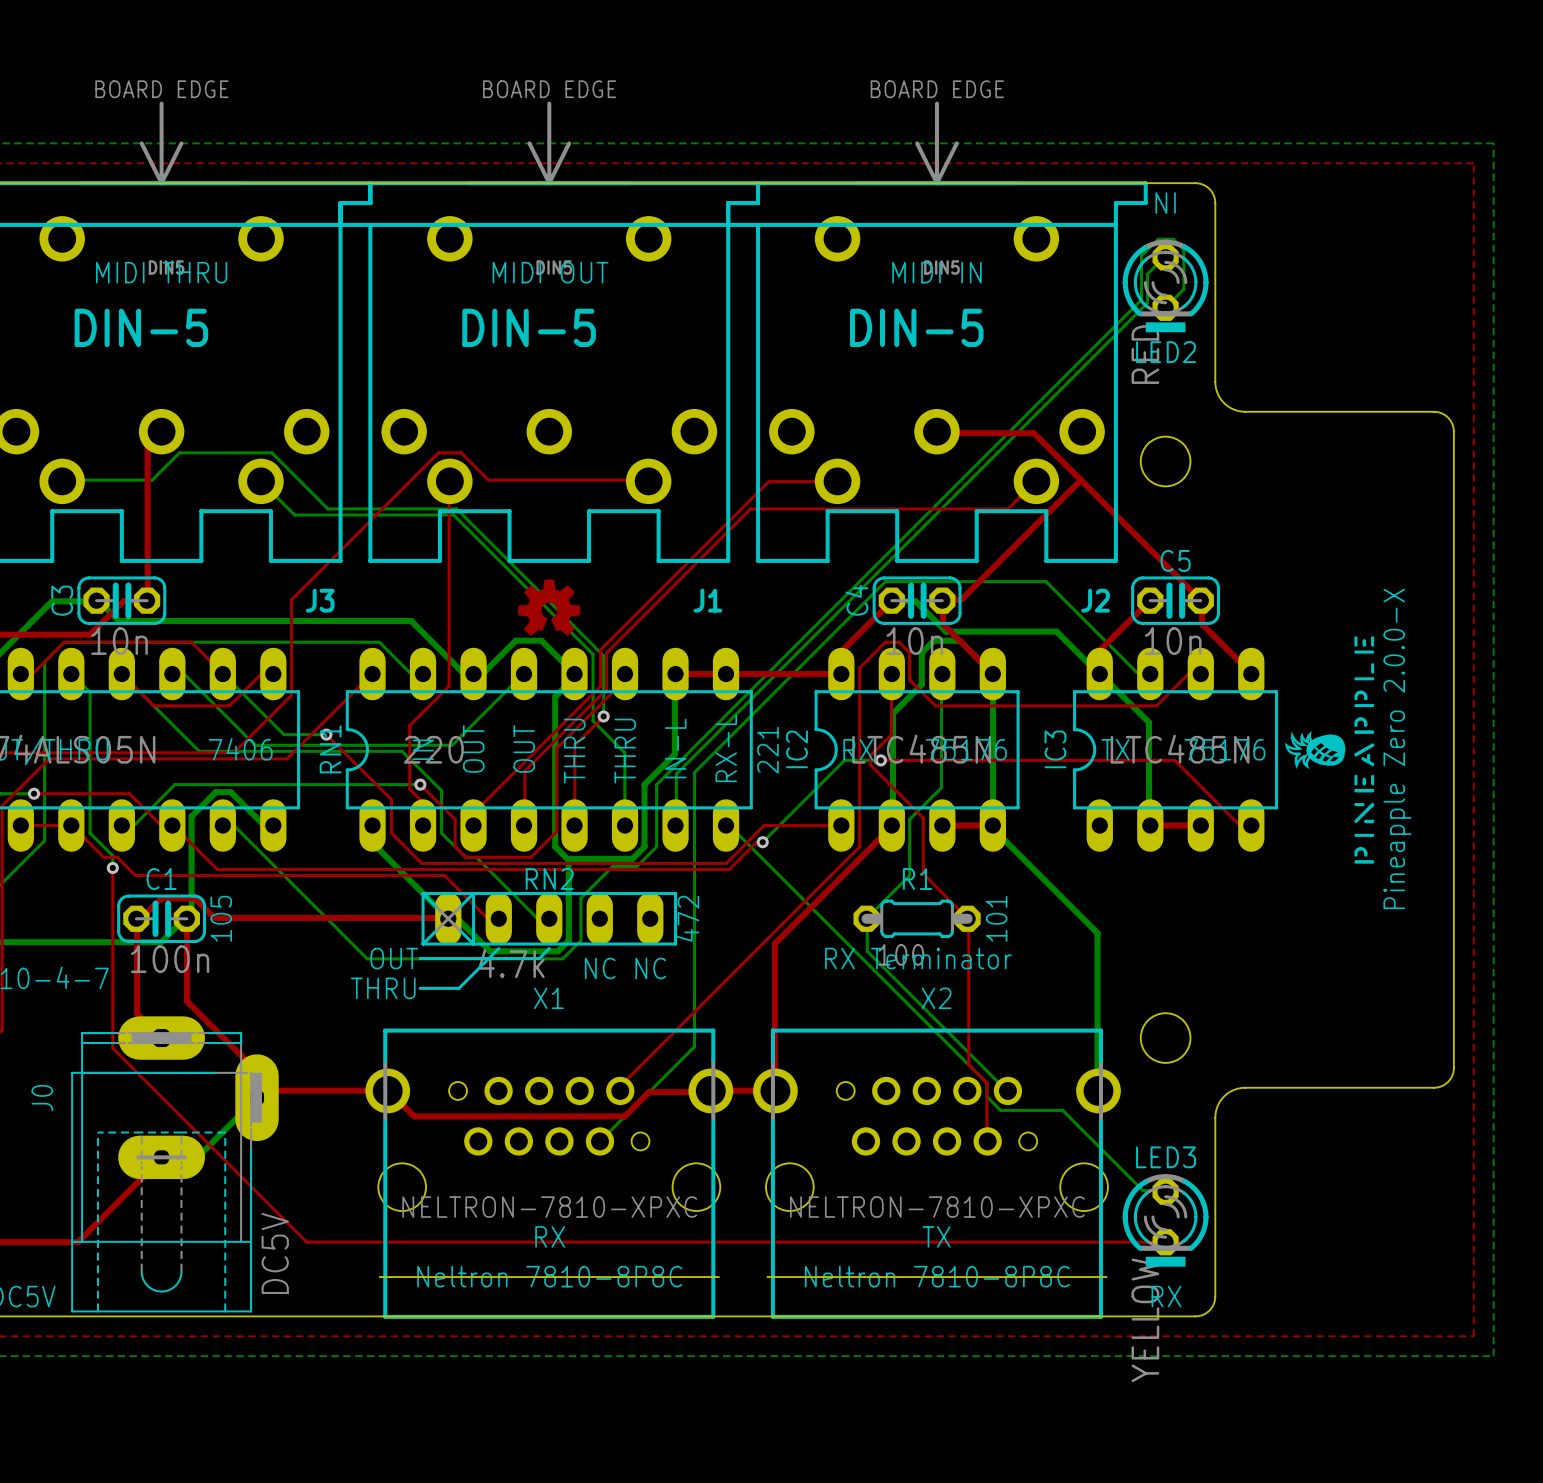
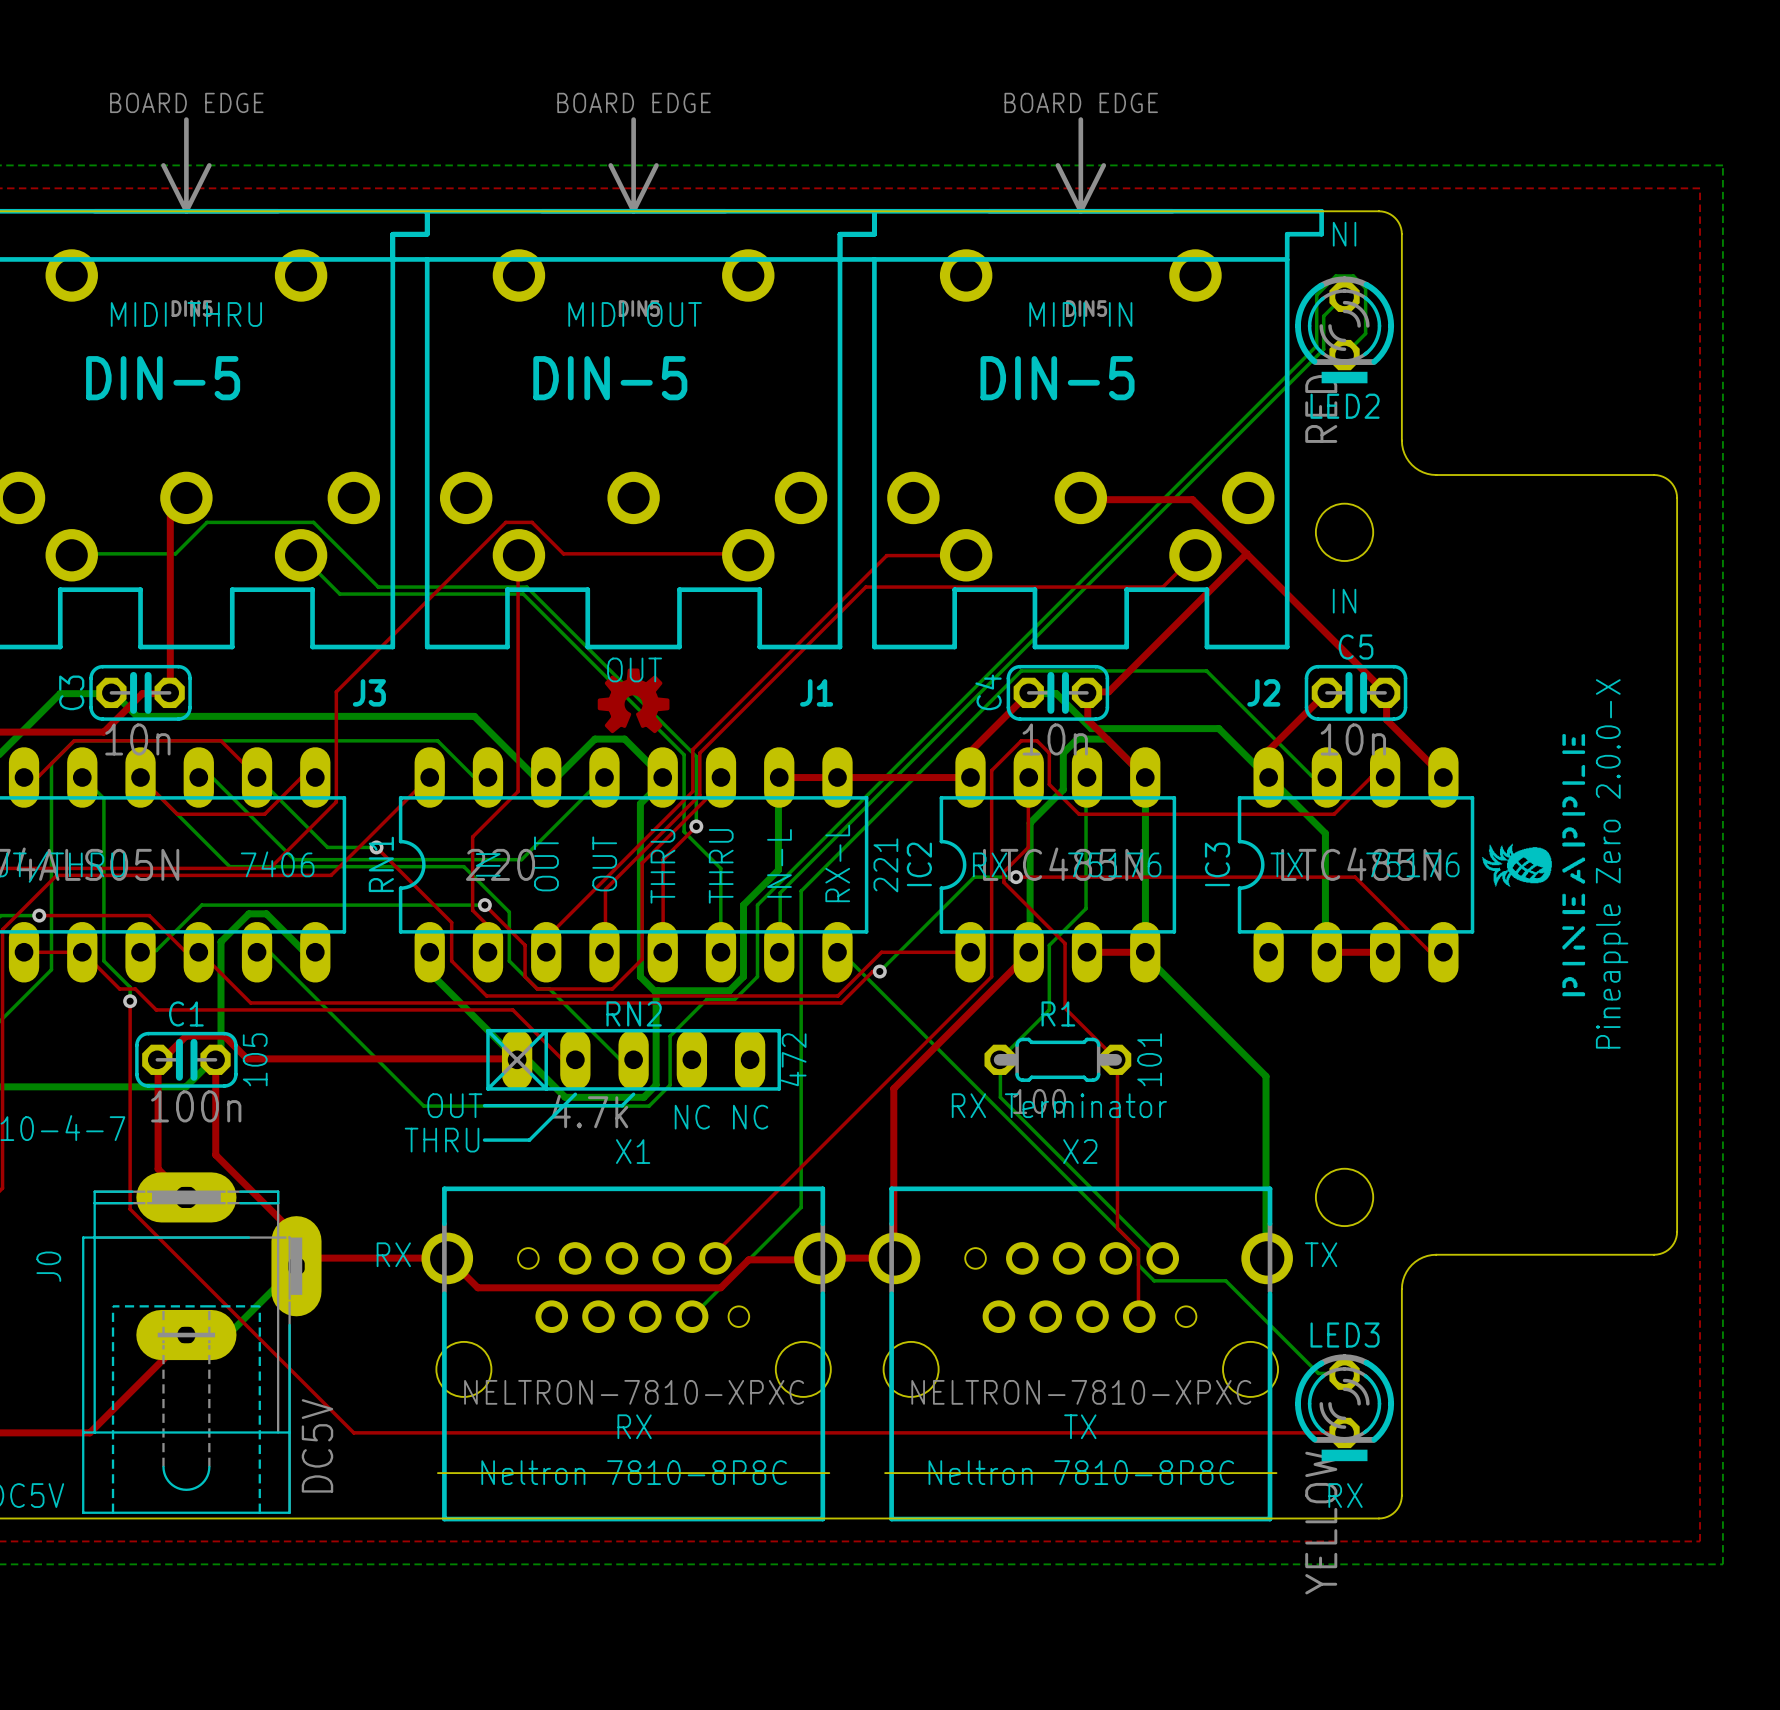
text: none -> IN (1344, 601)
text: none -> OUT (634, 669)
text: none -> RX (393, 1254)
text: none -> TX (1321, 1254)

